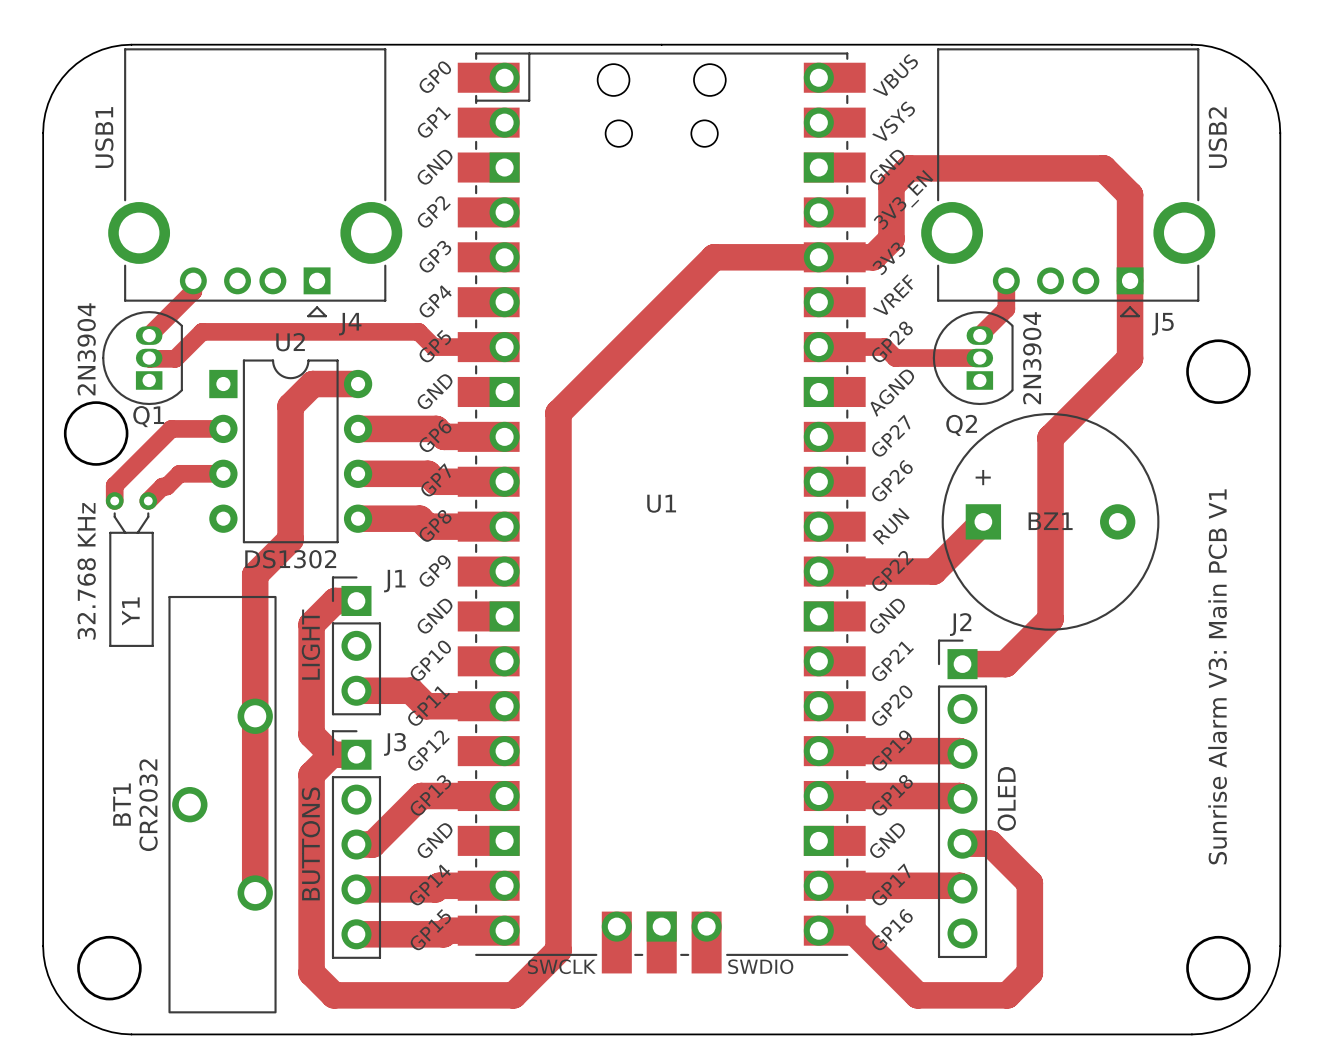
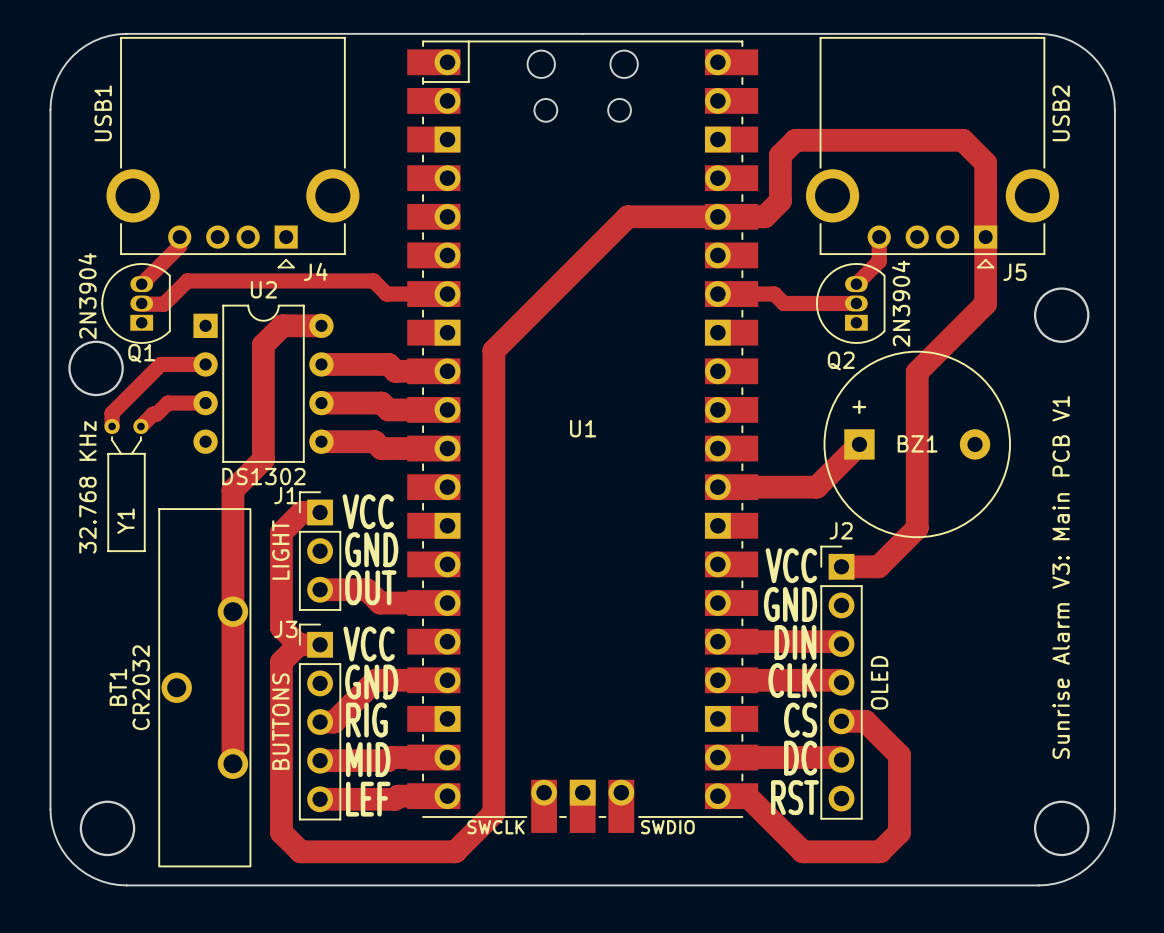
U1 footprint: [457, 52, 866, 974] -> [407, 40, 759, 833]
J1 name position: J1 (394, 581) -> J1 (285, 495)
text: none -> VCC (368, 511)
text: none -> GND (371, 549)
text: none -> VCC (791, 565)
text: none -> OUT (370, 587)
text: none -> GND (790, 604)
J3 name position: J3 (395, 744) -> J3 (285, 629)
text: none -> DIN (795, 642)
text: none -> VCC (369, 644)
text: none -> CLK (792, 680)
text: none -> GND (371, 682)
text: none -> RIG (366, 720)
text: none -> CS (800, 720)
text: none -> DC (800, 758)
text: none -> MID (368, 759)
text: none -> RST (794, 797)
text: none -> LEF (368, 799)

